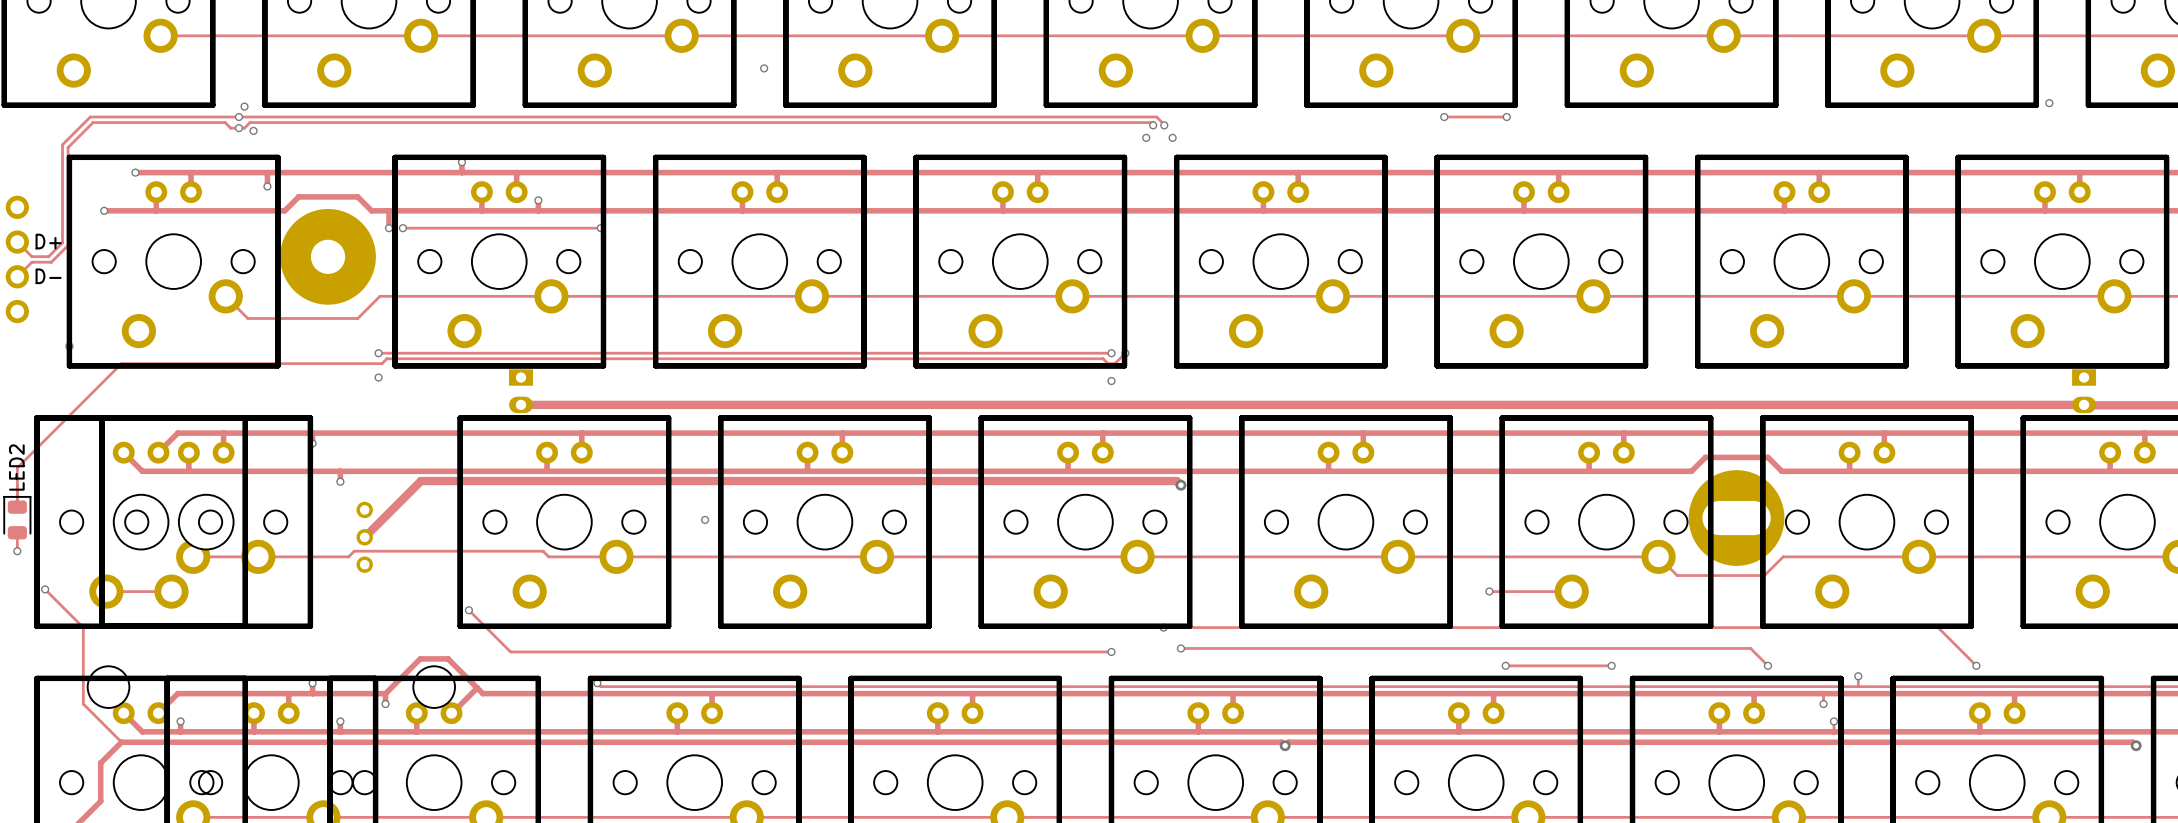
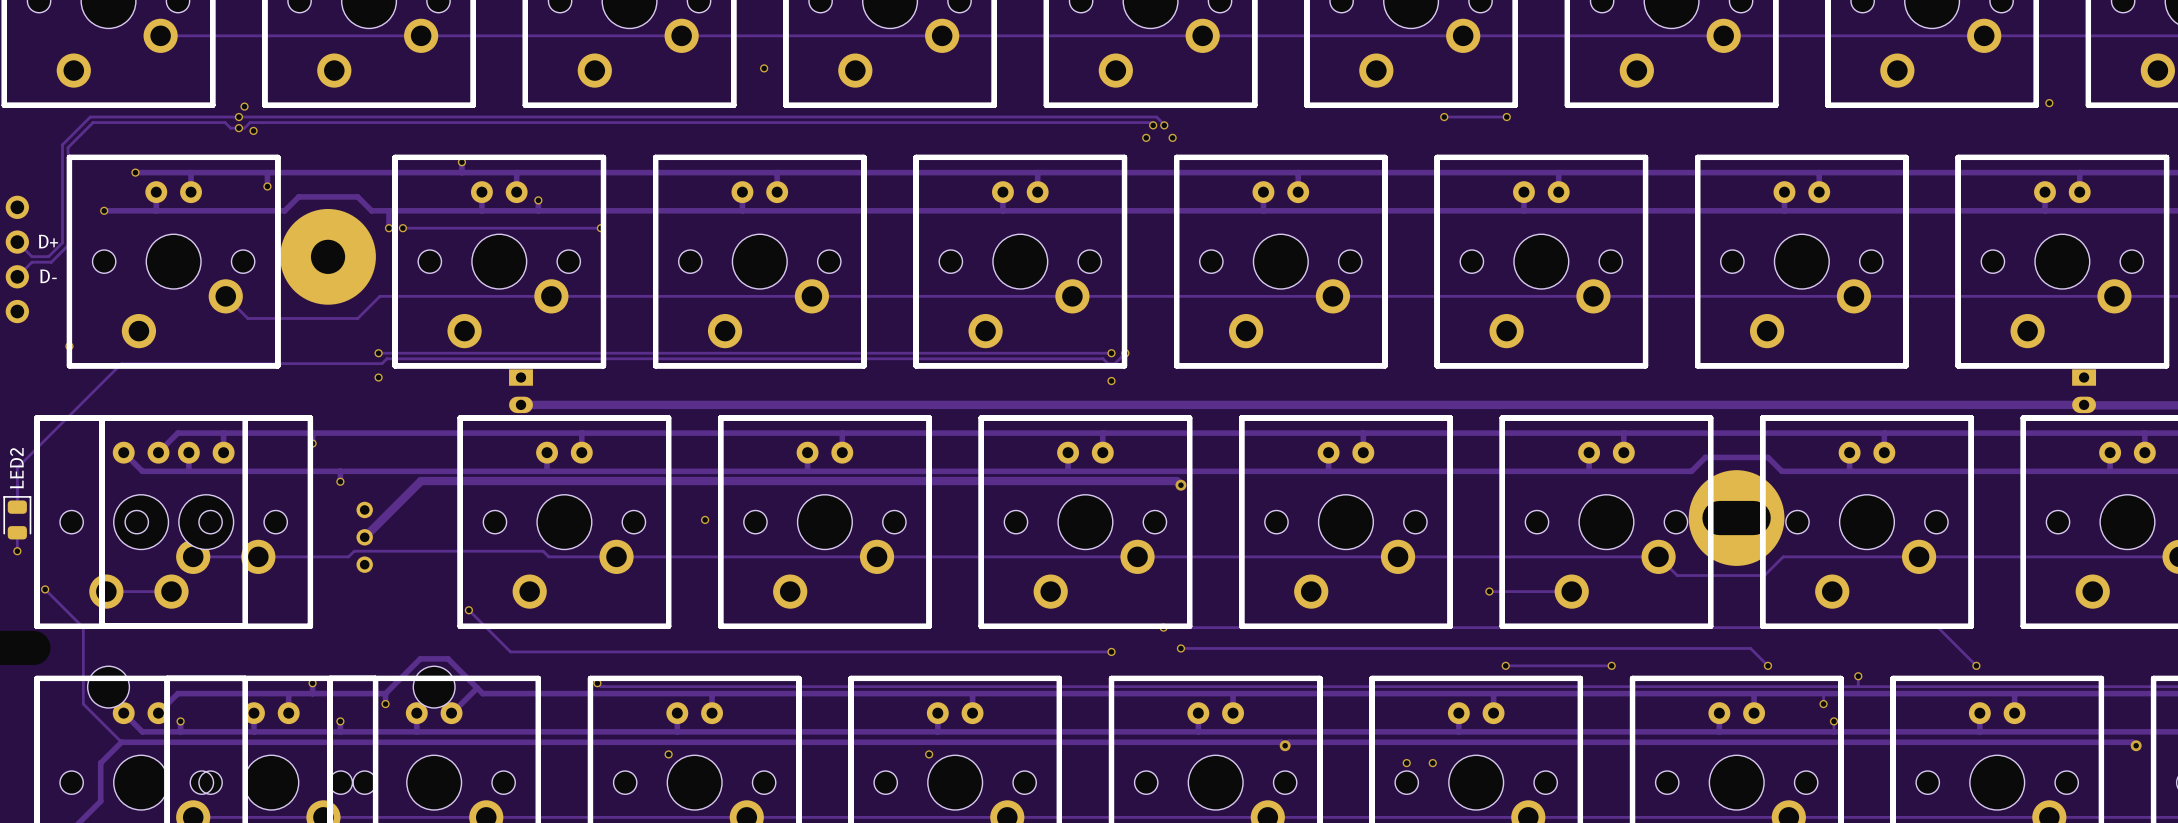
via: none -> (668, 754)
via: none -> (929, 754)
via: none -> (1406, 763)
via: none -> (1432, 763)

